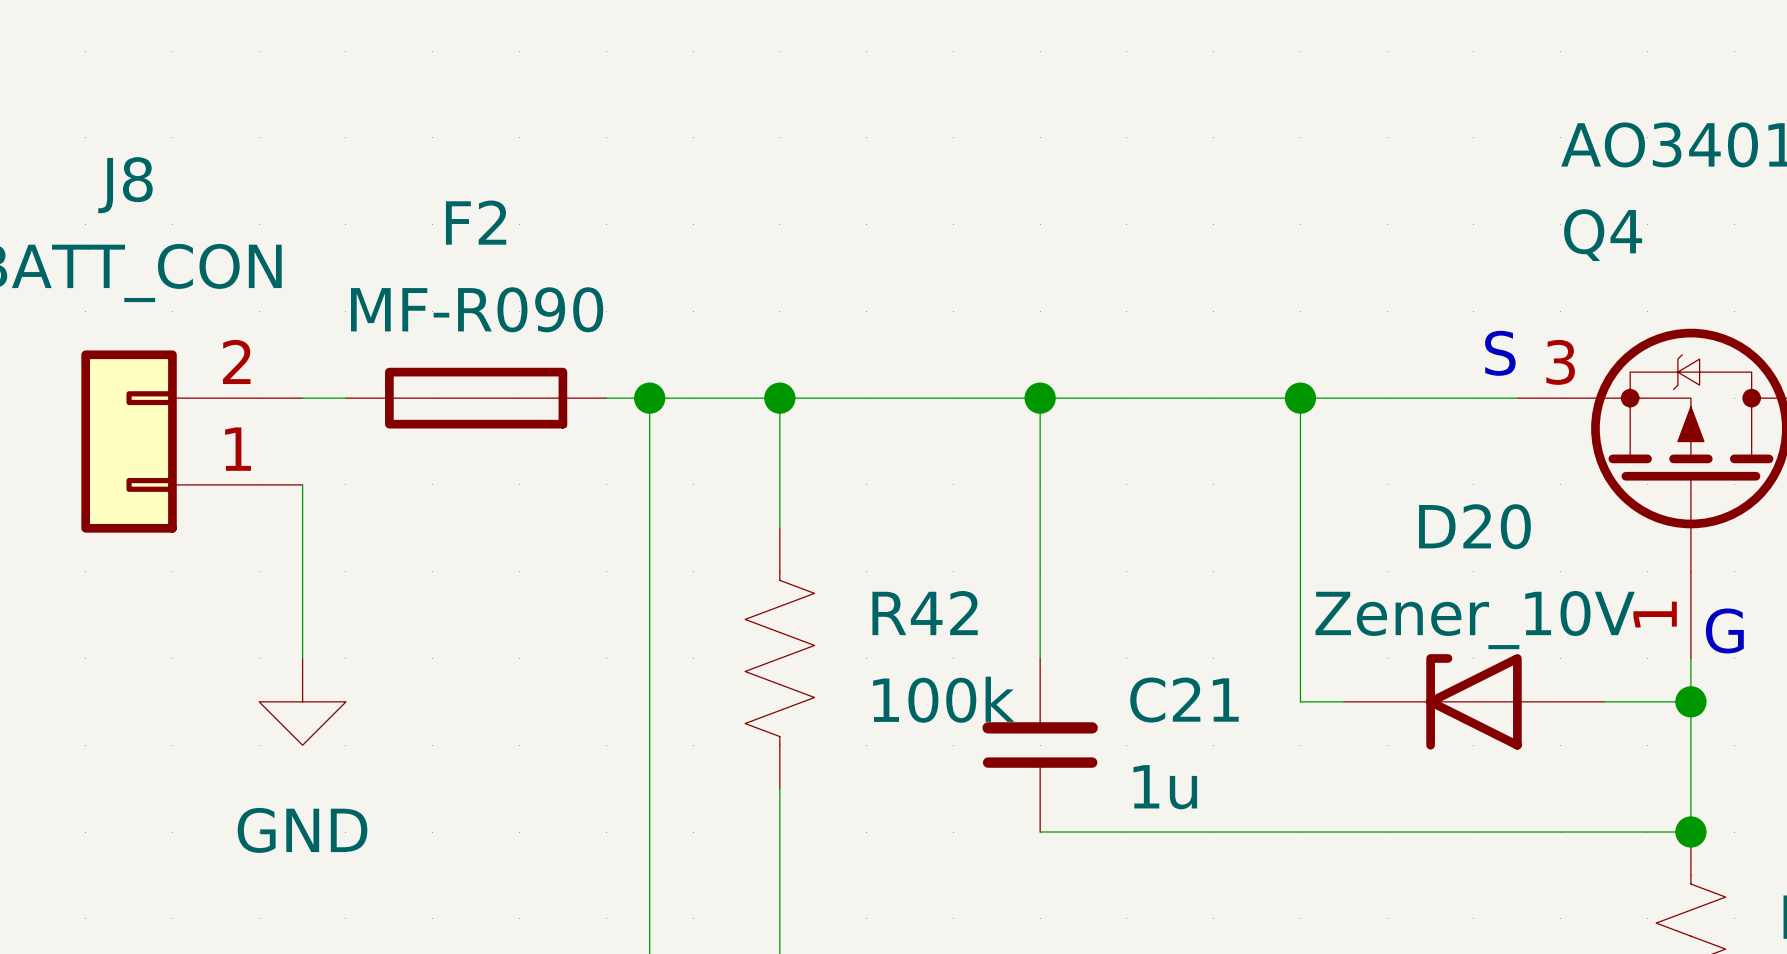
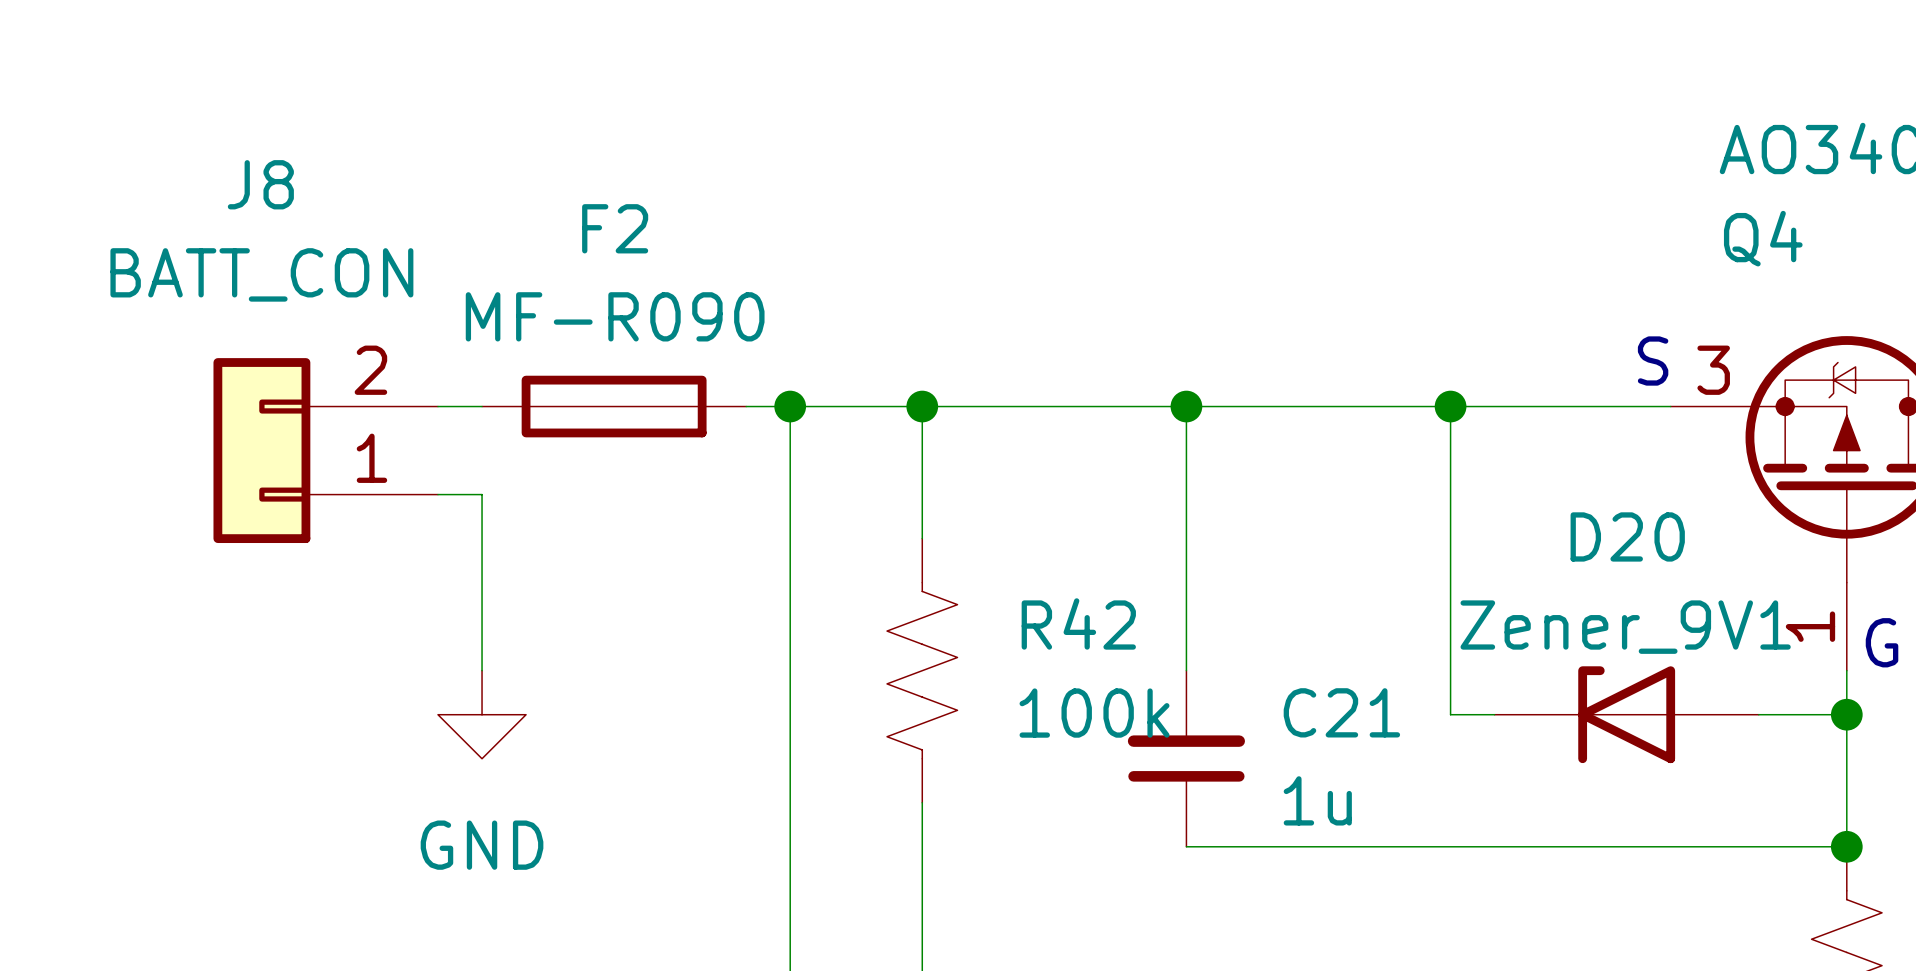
wire: (302, 484) (302, 658) -> (438, 494) (482, 494) (482, 670)
D20 value: Zener_10V (1475, 620) -> Zener_9V1 (1625, 627)
power symbol position: GND (302, 701) -> GND (482, 714)

